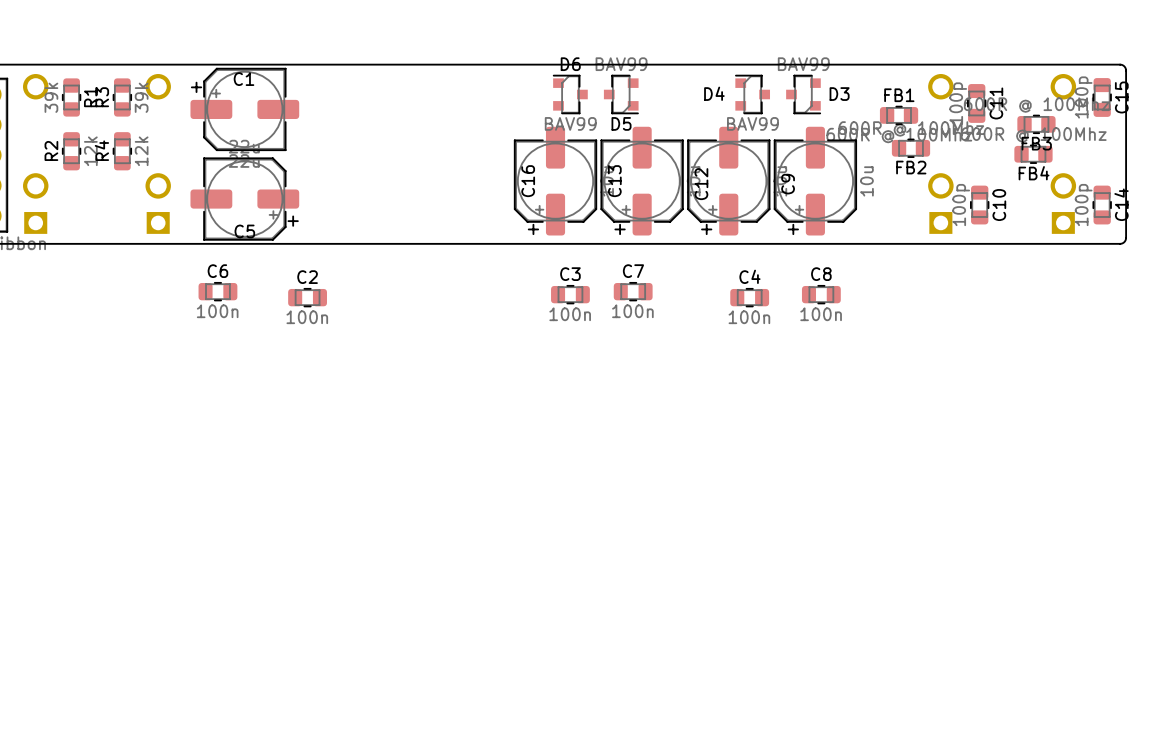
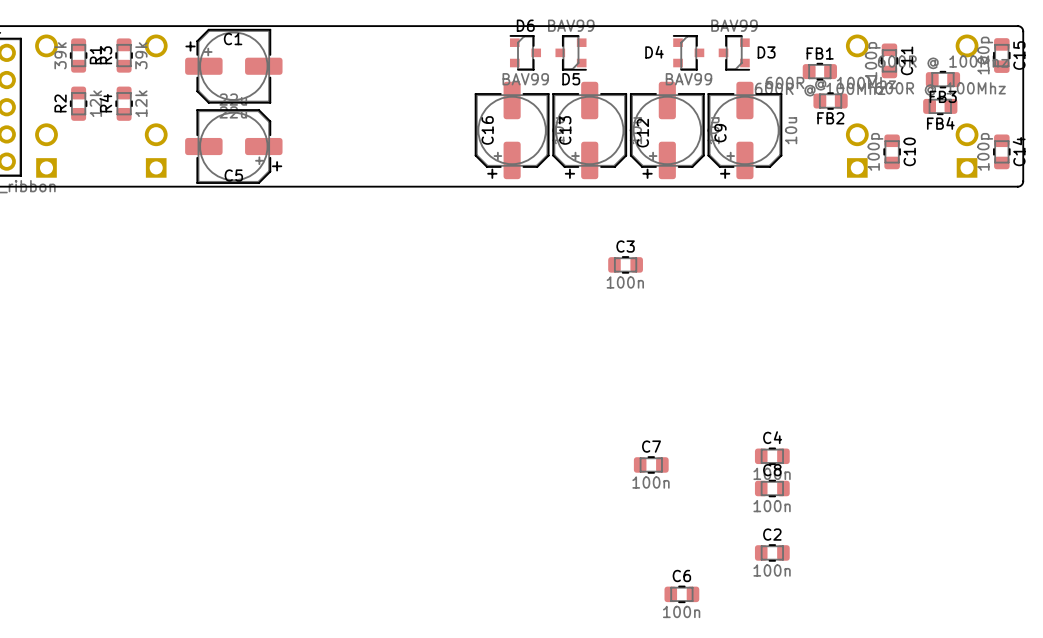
C6 position: (217, 291) -> (681, 594)
C7 position: (633, 291) -> (651, 464)
C3 position: (570, 294) -> (625, 264)
C8 position: (821, 294) -> (772, 488)
C2 position: (307, 297) -> (772, 552)
C4 position: (749, 297) -> (772, 456)

